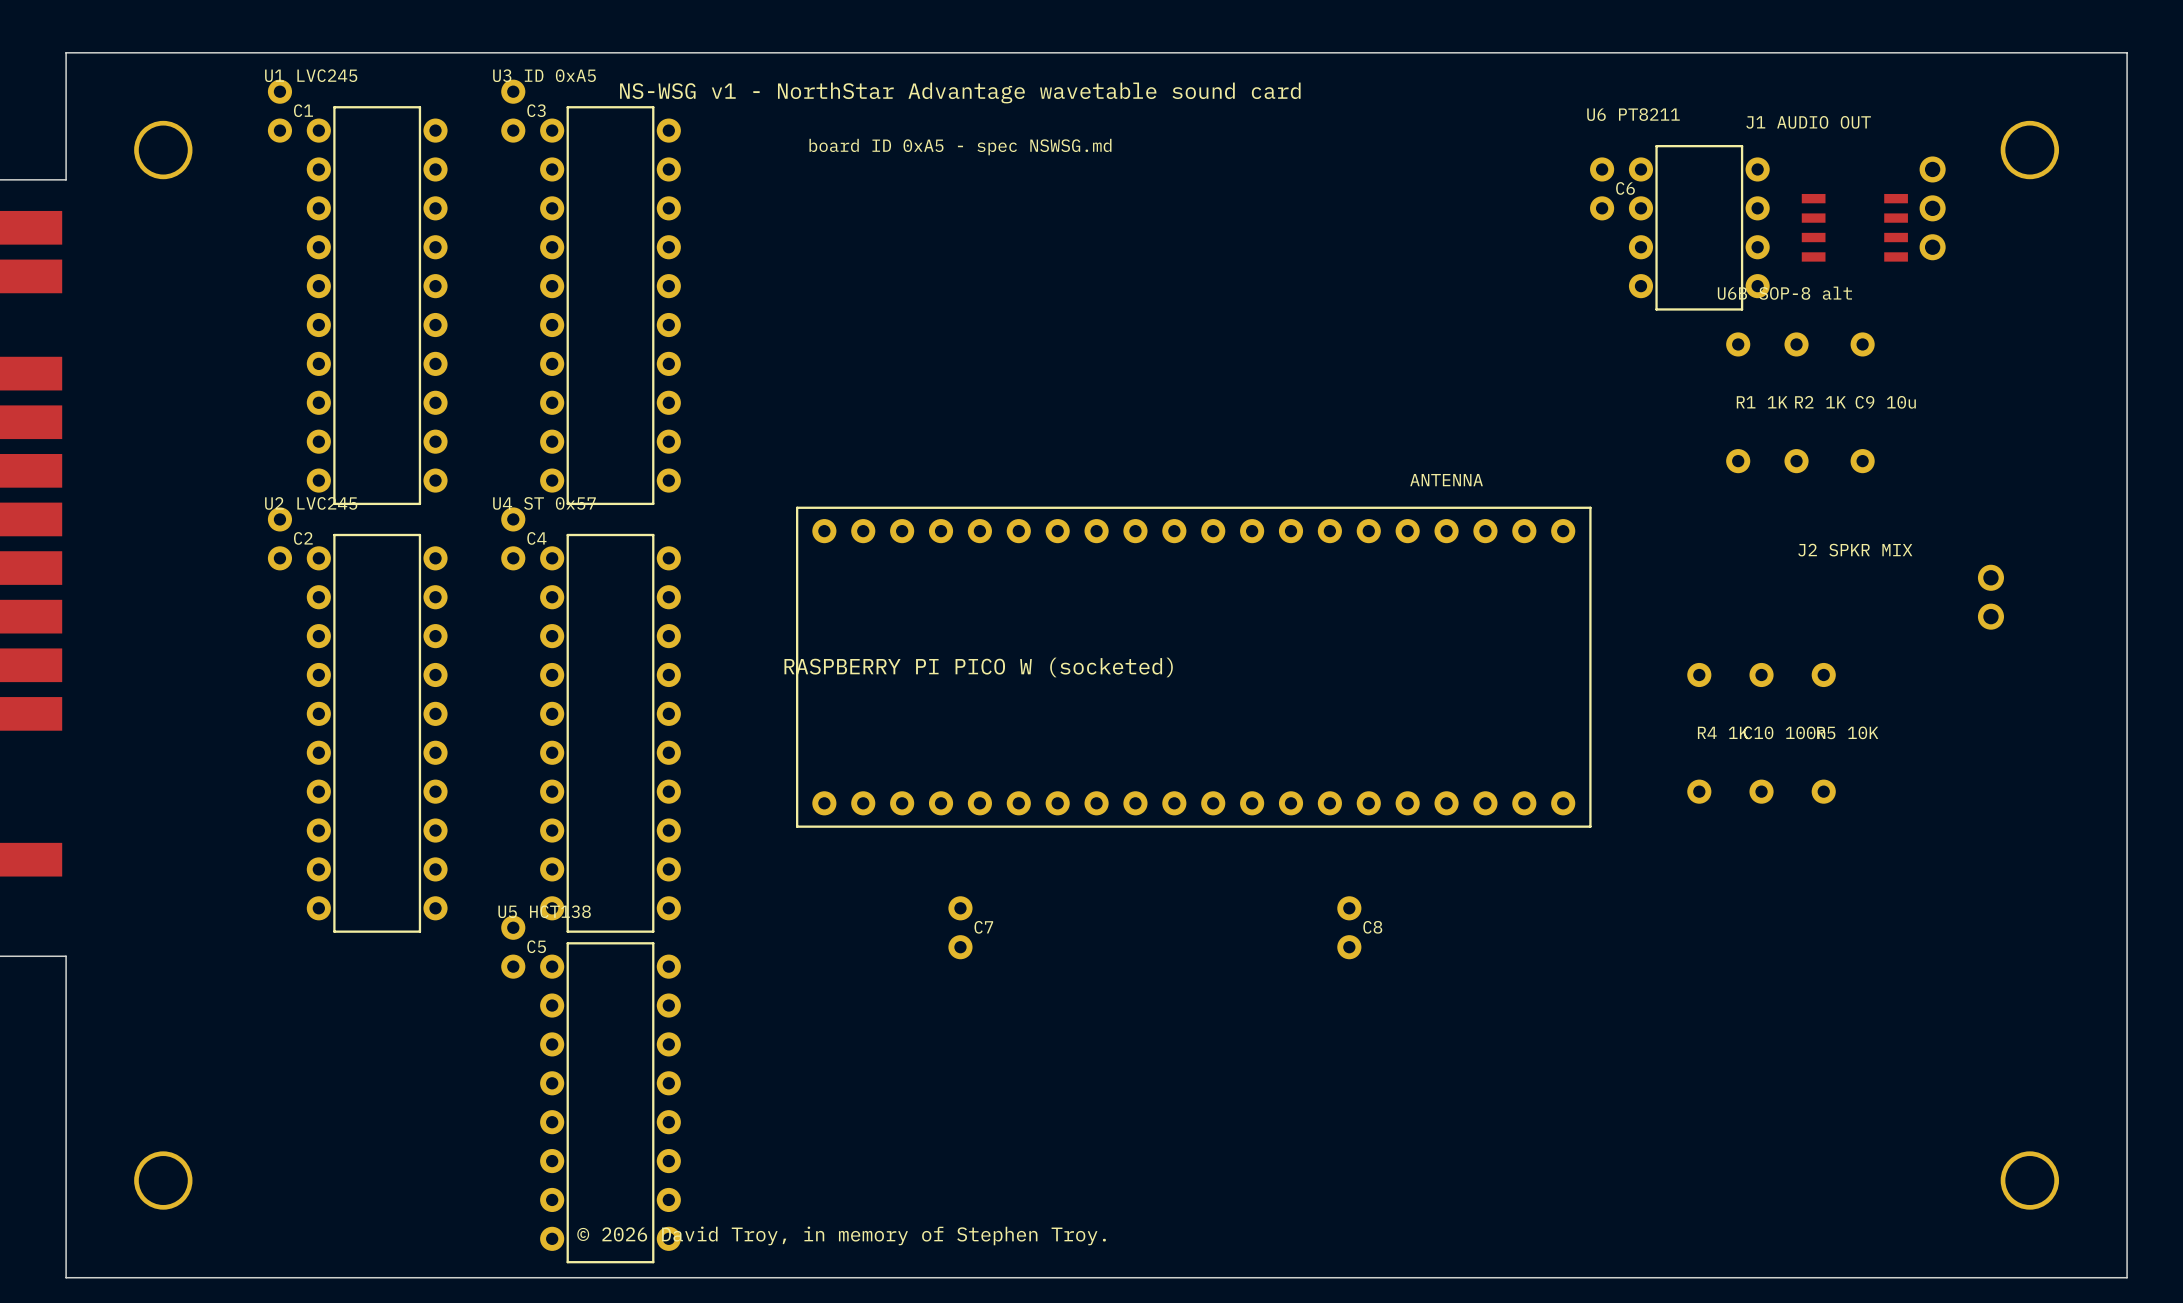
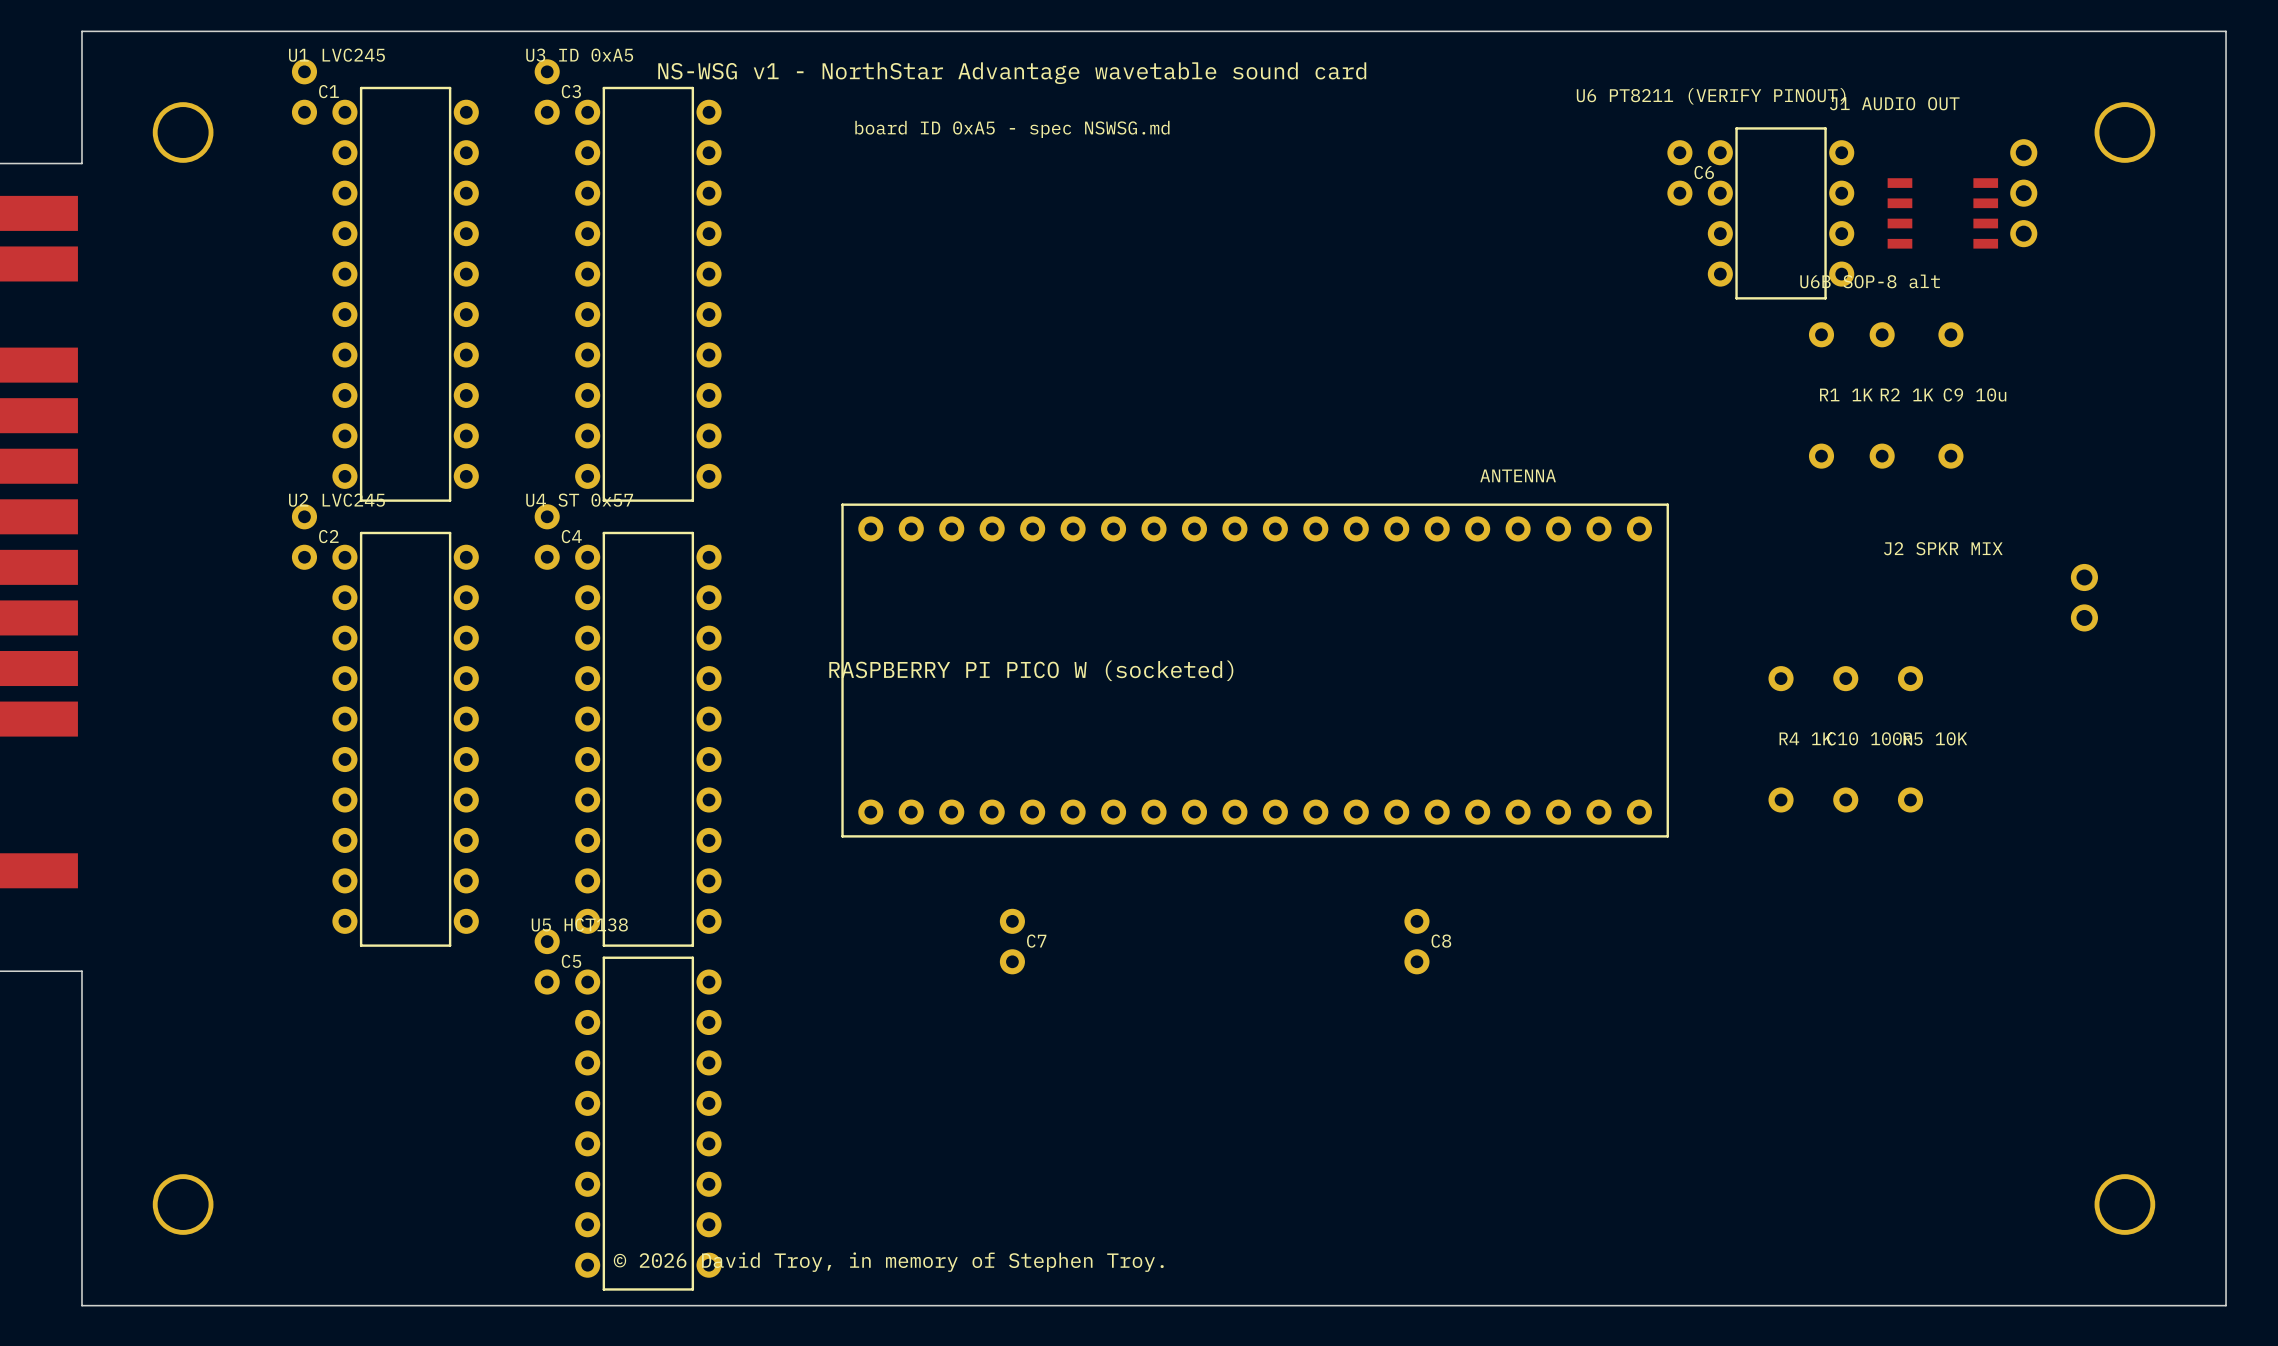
text: U6 PT8211 (1633, 114) -> U6 PT8211 (VERIFY PINOUT) (1711, 96)

